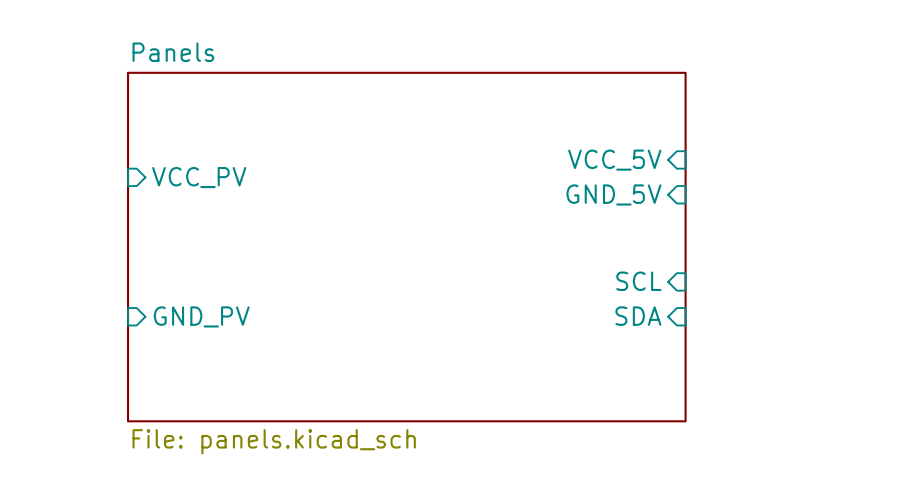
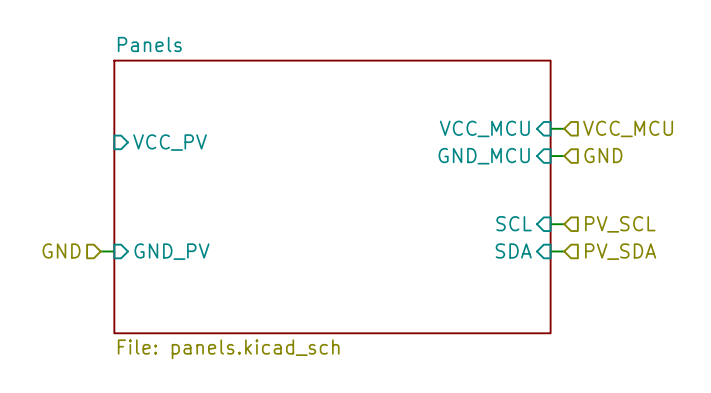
wire: none -> (550, 128) (564, 128)
sheet pin: VCC_5V (614, 160) -> VCC_MCU (484, 128)
hierarchical label: none -> VCC_MCU (628, 128)
sheet pin: GND_5V (613, 194) -> GND_MCU (484, 156)
wire: none -> (550, 156) (564, 156)
hierarchical label: none -> GND (603, 155)
wire: none -> (550, 224) (564, 224)
hierarchical label: none -> PV_SCL (620, 224)
hierarchical label: none -> GND (61, 250)
wire: none -> (100, 251) (114, 251)
wire: none -> (550, 251) (564, 251)
hierarchical label: none -> PV_SDA (620, 251)

